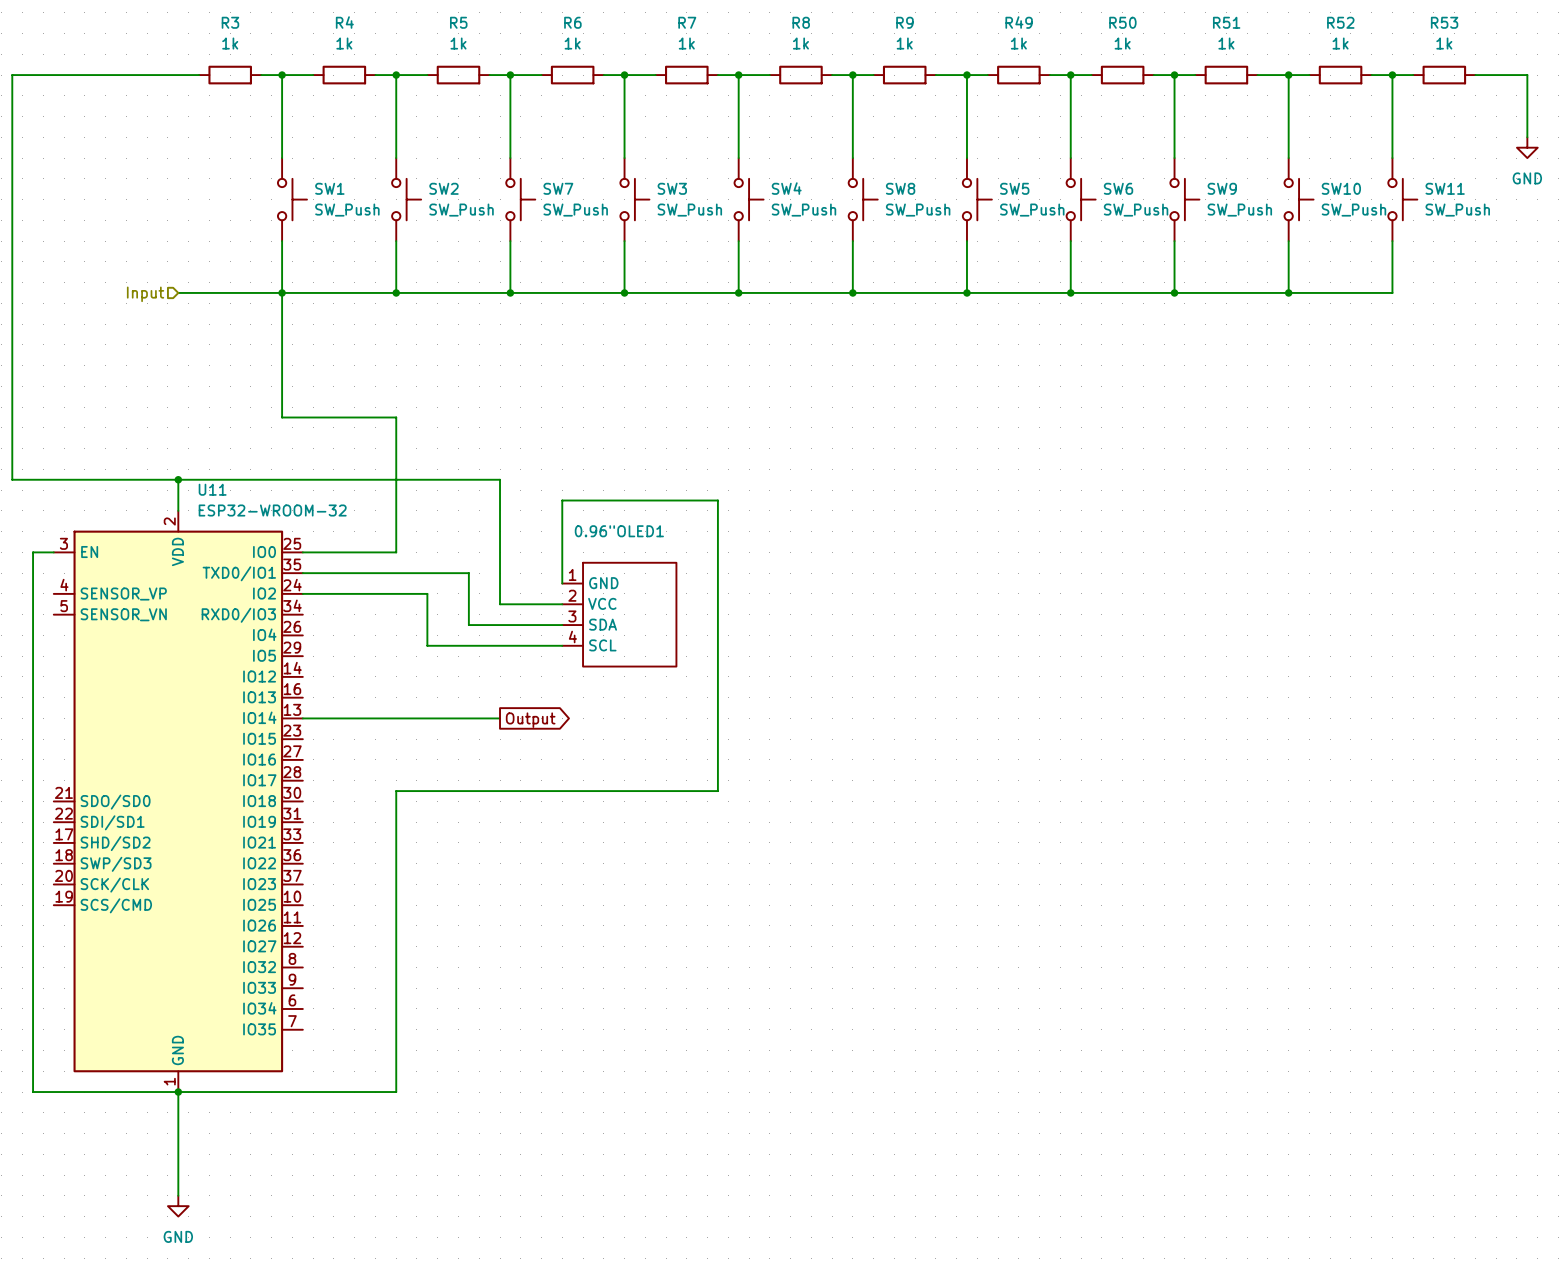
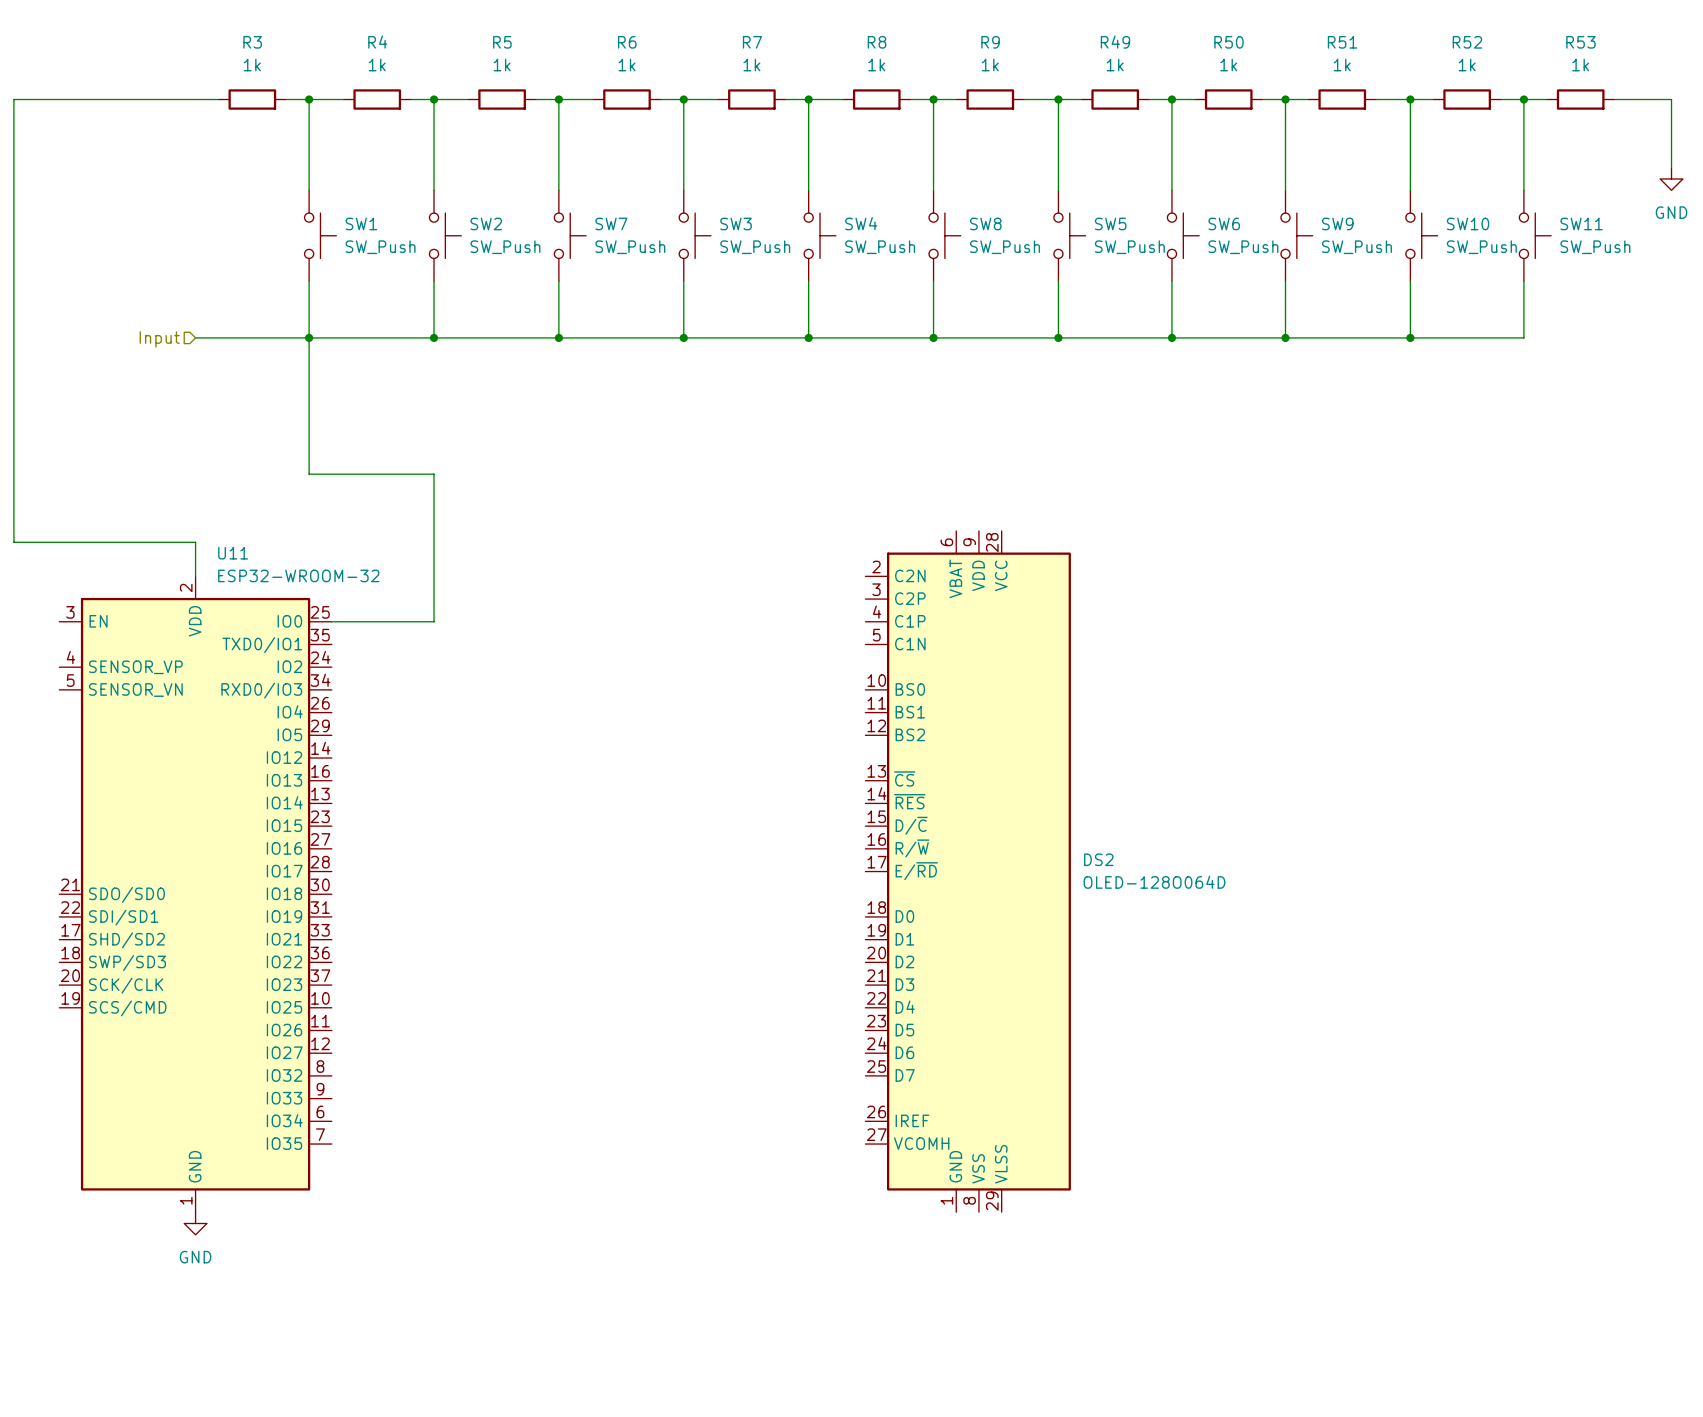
wire: (178, 479) (500, 479) (500, 604) (562, 604) -> none
junction: (178, 479) -> none
wire: (53, 552) (33, 552) (33, 1092) (396, 1092) (396, 791) (717, 791) (717, 500) (562, 500) (562, 583) -> none
wire: (302, 573) (468, 573) (468, 625) (562, 625) -> none
wire: (302, 593) (427, 593) (427, 645) (562, 645) -> none
0.96"OLED1: (619, 614) -> none
wire: (302, 718) (500, 718) -> none
global label: Output (530, 720) -> none
DS2: none -> OLED-128O064D (968, 871)
wire: (178, 1092) (178, 1195) -> none
junction: (178, 1092) -> none
power symbol position: GND (178, 1206) -> GND (195, 1223)

